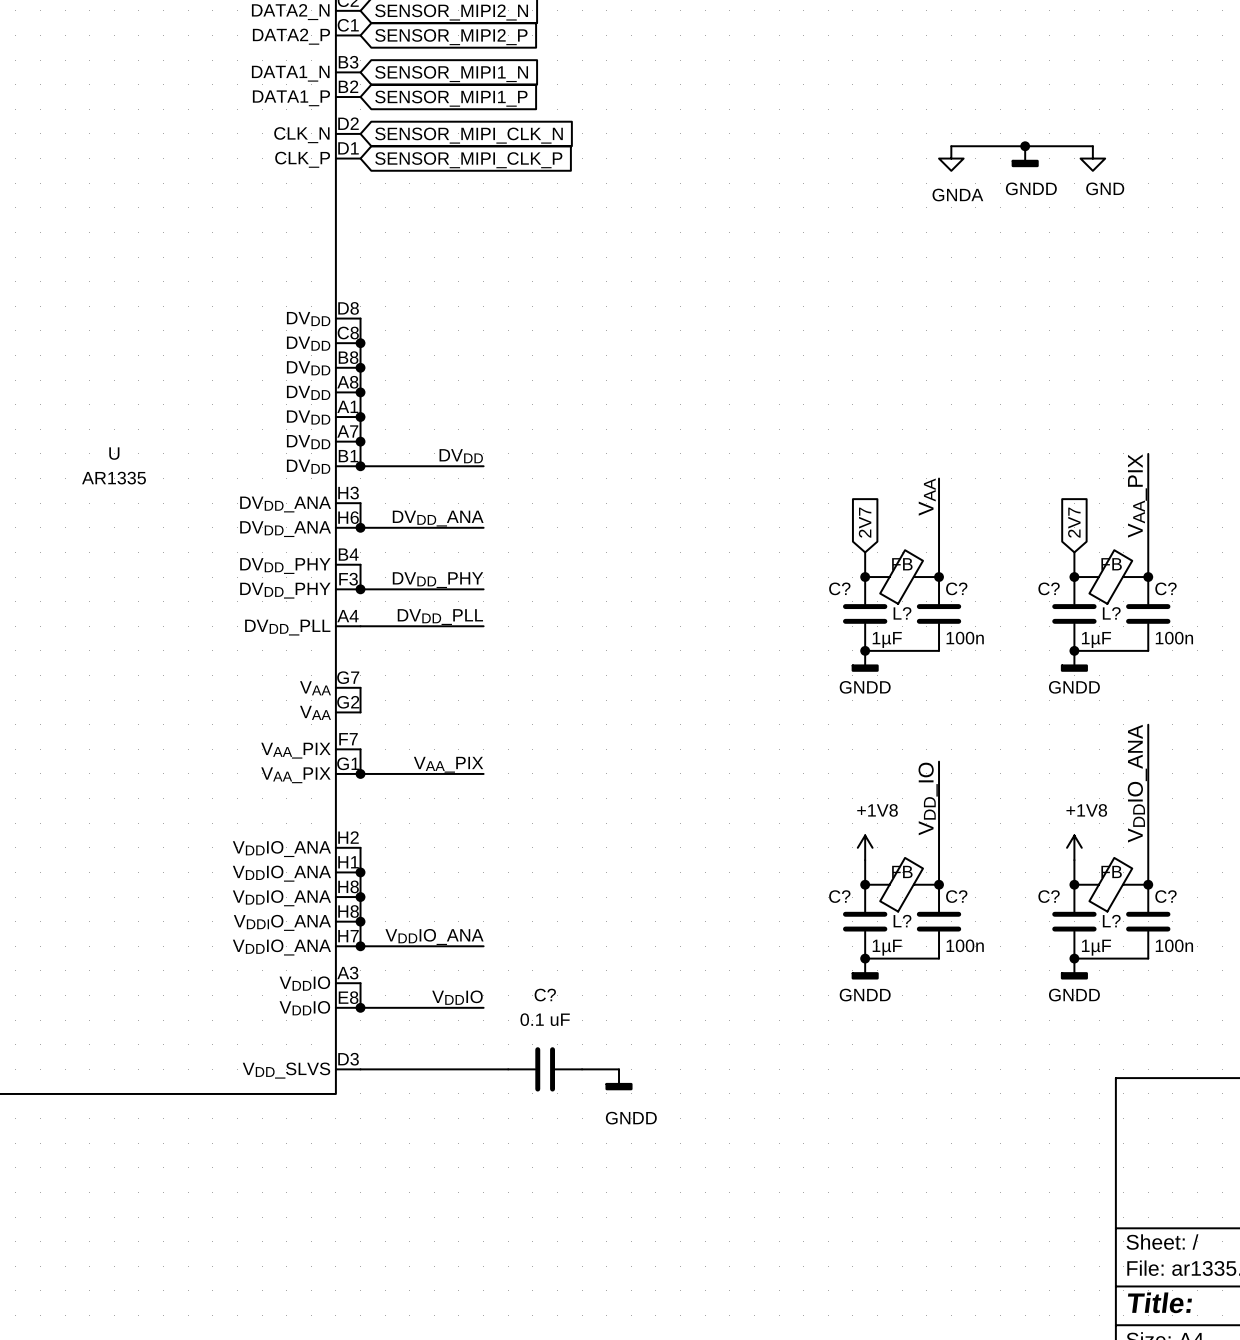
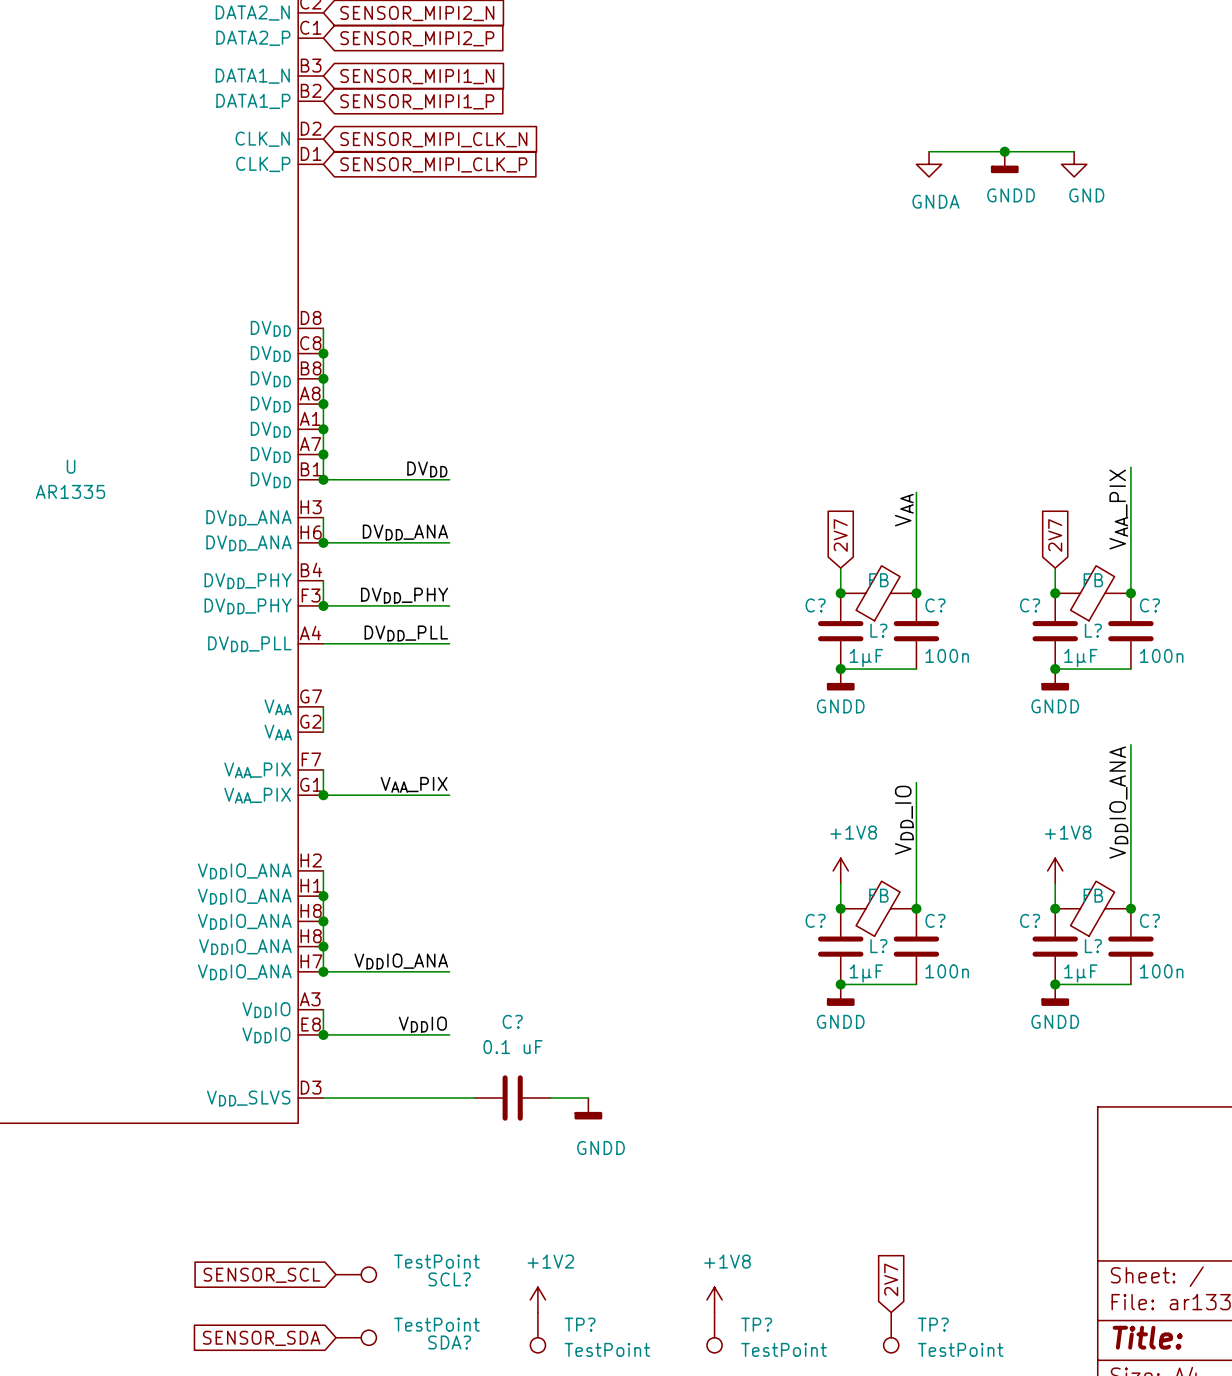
SCL?: none -> TestPoint (356, 1274)
global label: none -> SENSOR_SCL (261, 1275)
global label: none -> 2V7 (891, 1279)
power symbol: none -> +1V2 (537, 1299)
power symbol: none -> +1V8 (714, 1299)
TP?: none -> TestPoint (537, 1332)
TP?: none -> TestPoint (714, 1332)
TP?: none -> TestPoint (891, 1332)
SDA?: none -> TestPoint (356, 1337)
global label: none -> SENSOR_SDA (261, 1338)

